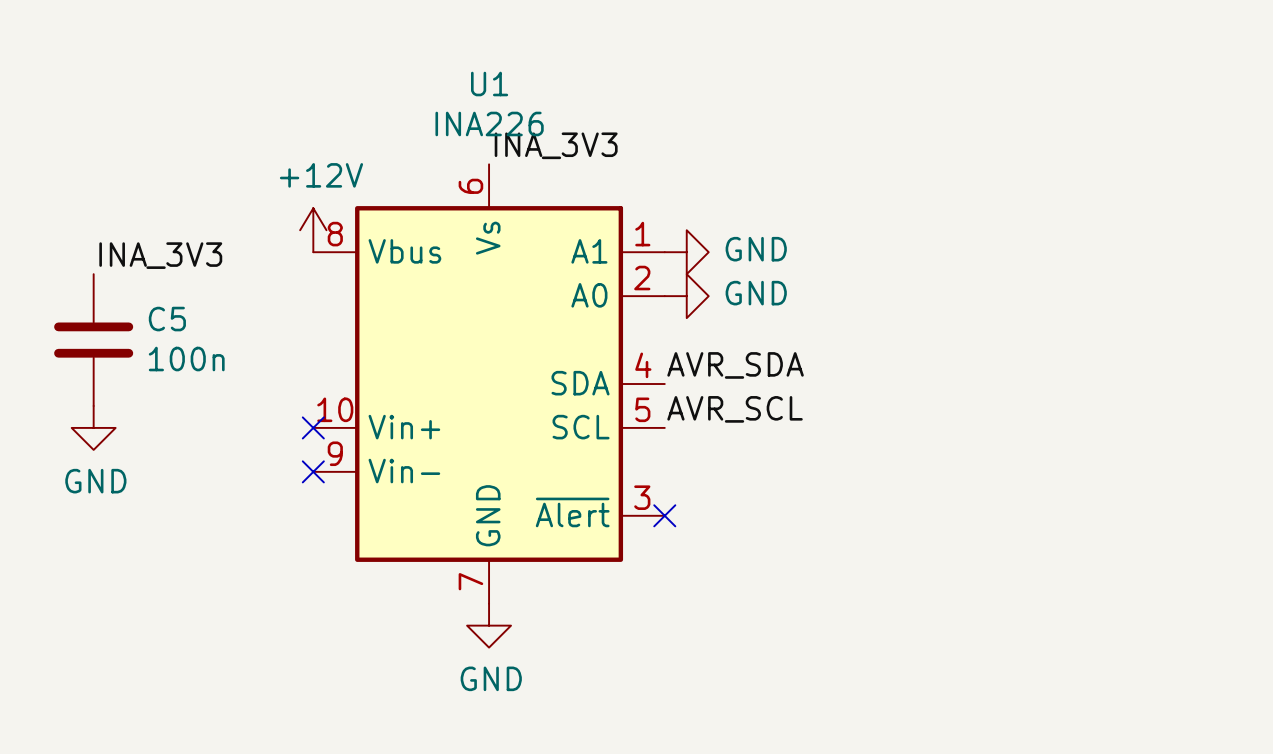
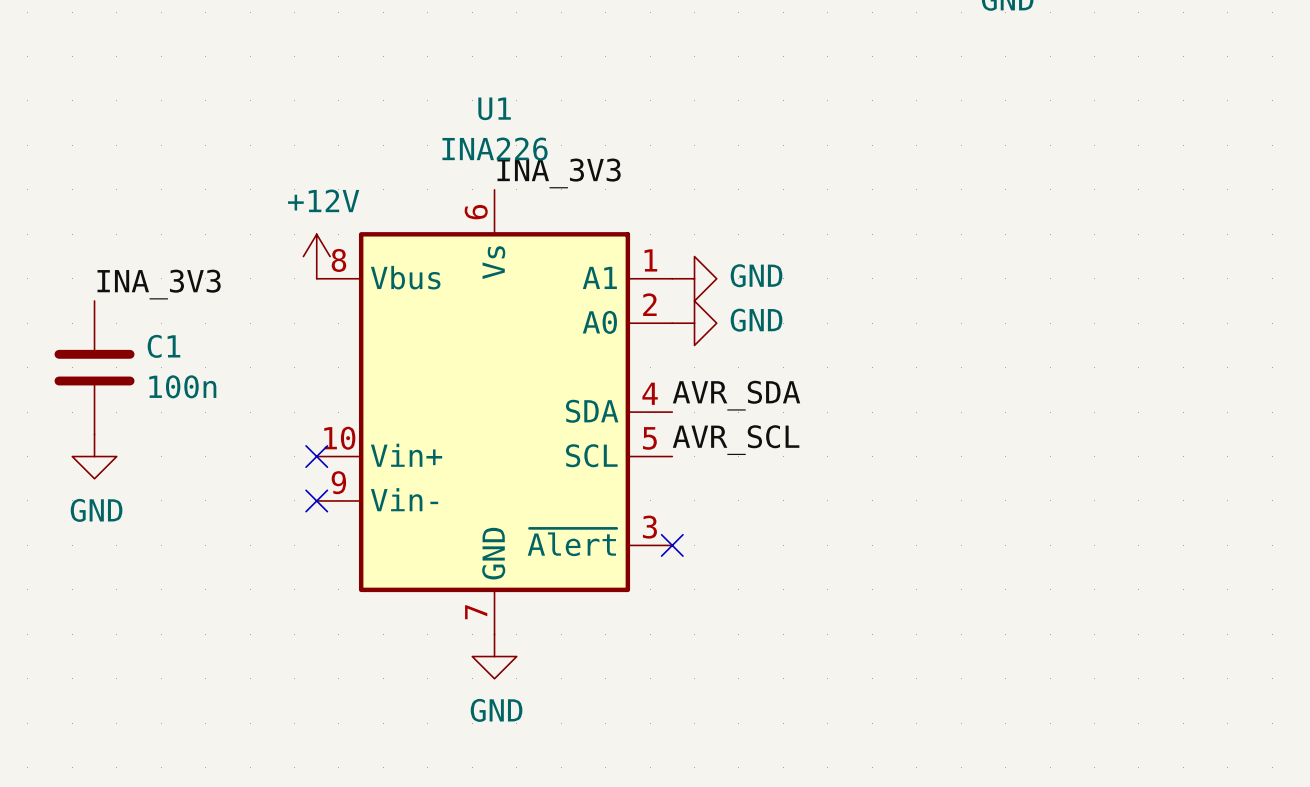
C5 name: C5 (167, 319) -> C1 (163, 346)

